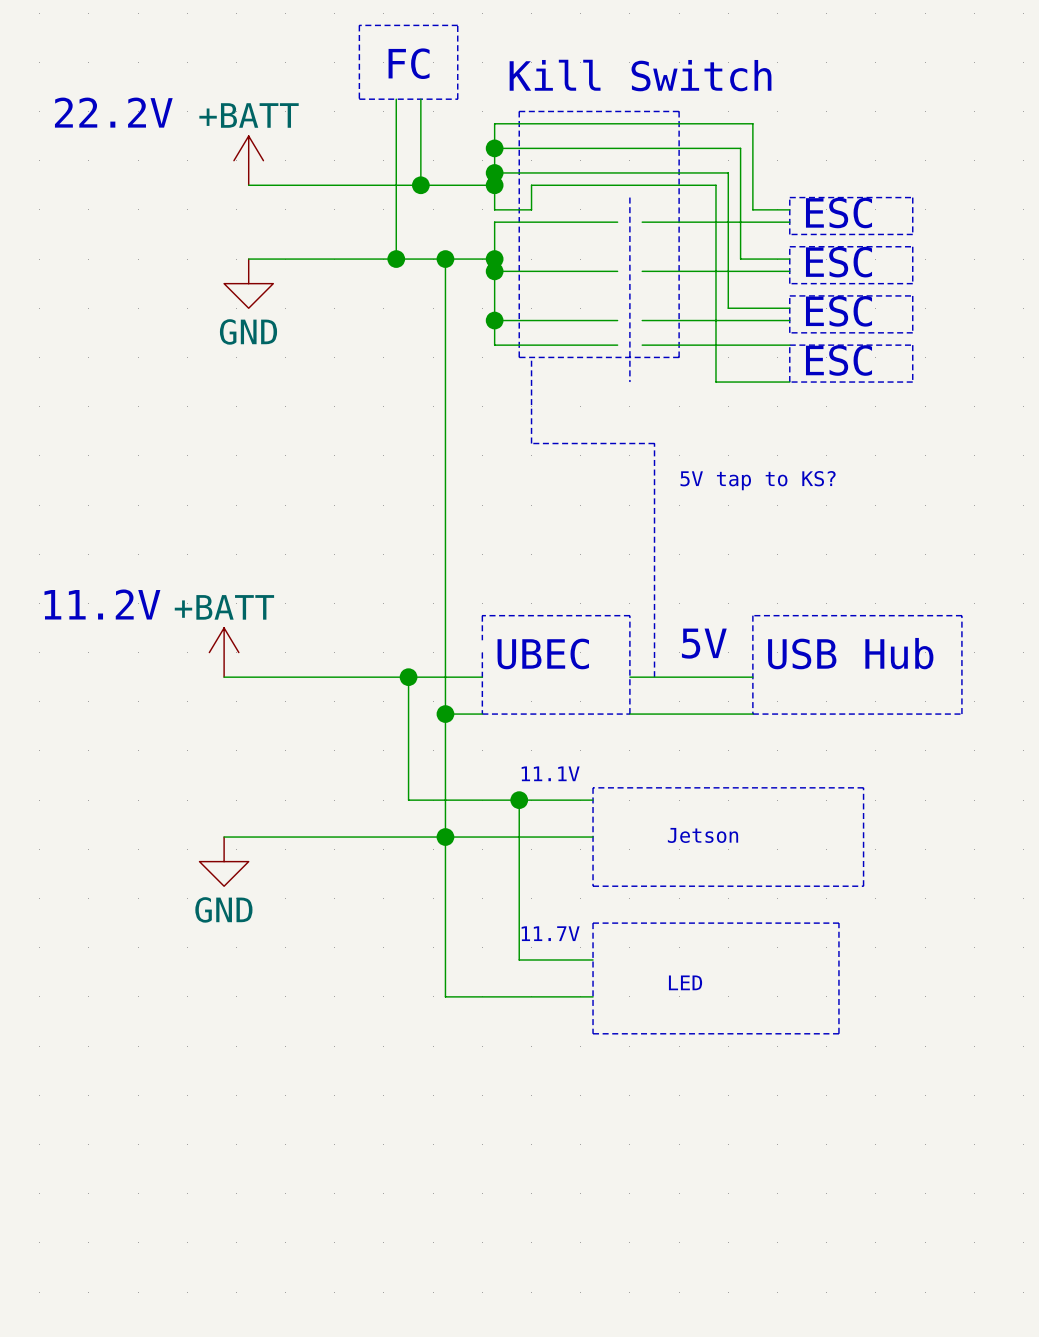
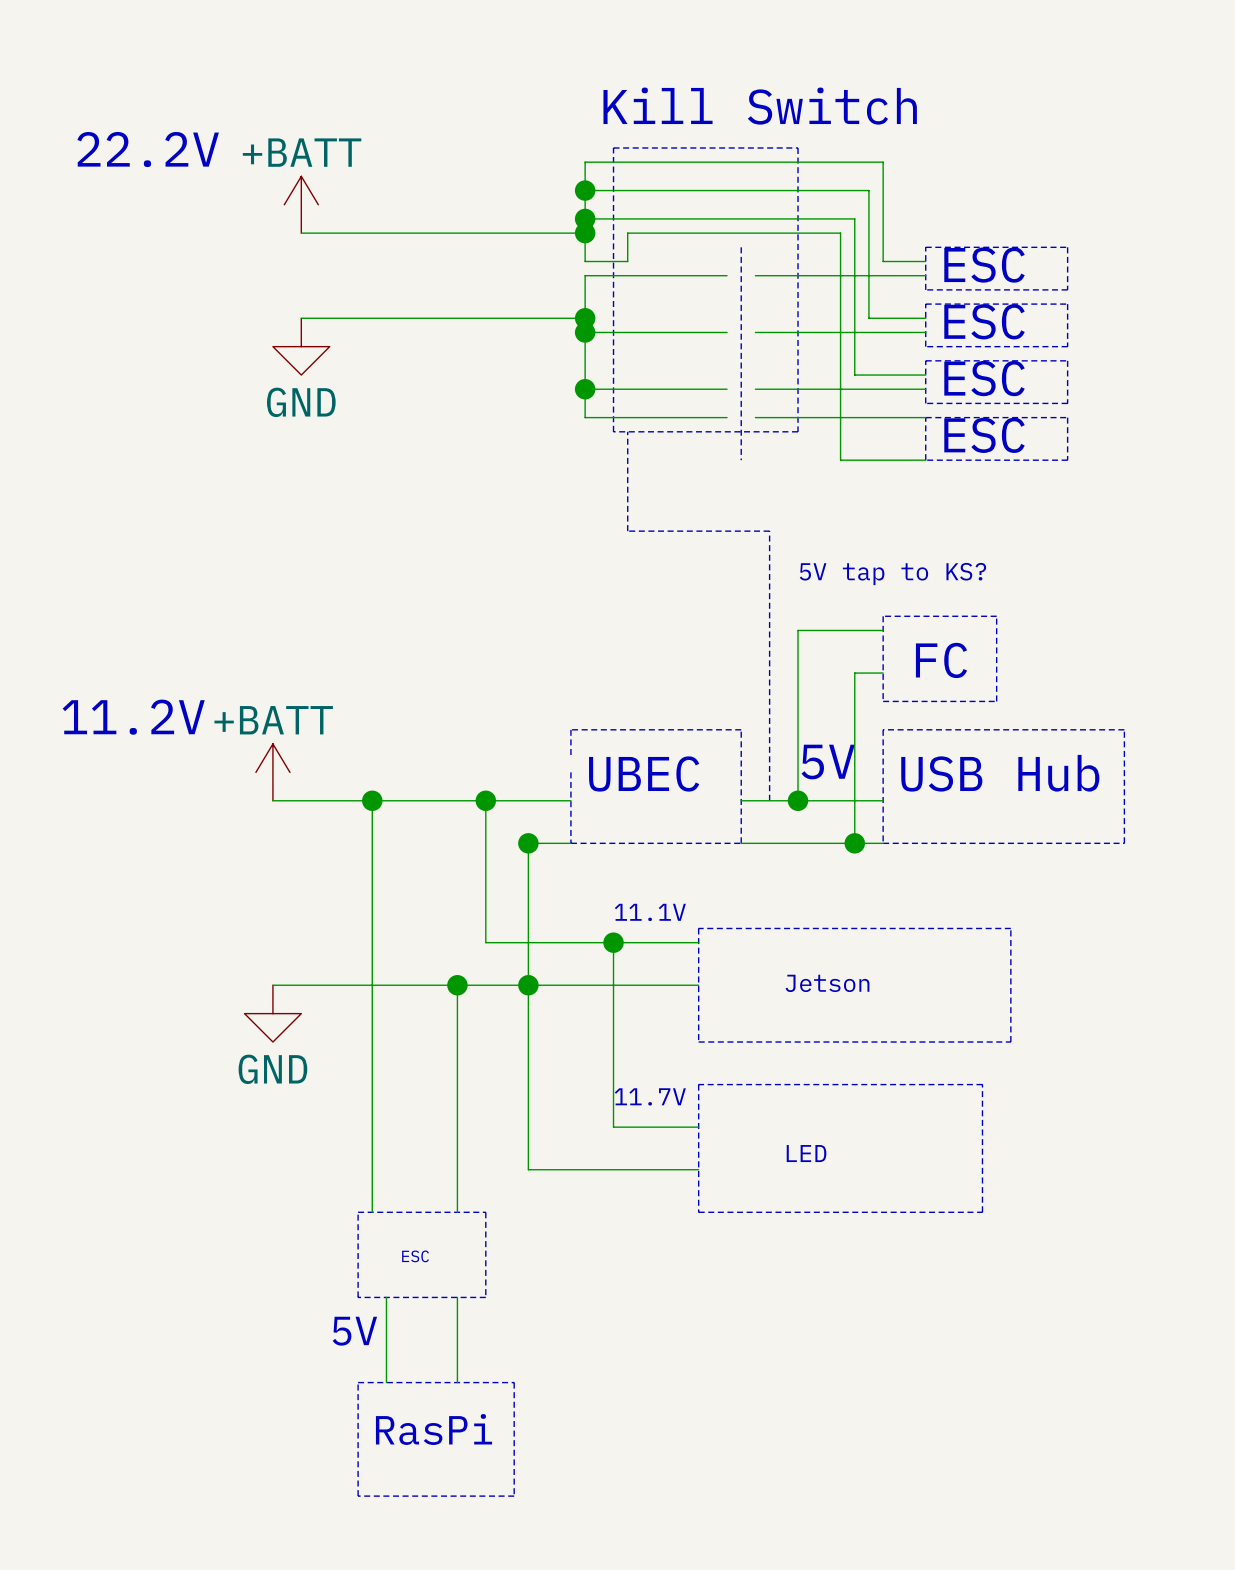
line: (359, 25) (457, 25) (457, 99) (359, 99) (359, 25) -> none
text: FC (409, 63) -> none
wire: (396, 99) (396, 259) -> none
wire: (420, 99) (420, 185) -> none
junction: (420, 185) -> none
junction: (396, 259) -> none
wire: (445, 259) (445, 714) -> none
junction: (445, 259) -> none
line: none -> (883, 616) (996, 616) (996, 701) (883, 701) (883, 616)
wire: none -> (883, 630) (797, 630) (797, 800)
text: none -> FC (941, 660)
wire: none -> (883, 673) (854, 673) (854, 843)
wire: none -> (372, 800) (372, 1212)
junction: none -> (372, 800)
junction: none -> (797, 800)
junction: none -> (854, 843)
wire: none -> (457, 985) (457, 1212)
junction: none -> (457, 985)
line: none -> (358, 1212) (485, 1212) (485, 1297) (358, 1297) (358, 1212)
text: none -> ESC (415, 1256)
wire: none -> (386, 1297) (386, 1382)
wire: none -> (457, 1297) (457, 1382)
text: none -> 5V (354, 1331)
line: none -> (358, 1382) (514, 1382) (514, 1496) (358, 1496) (358, 1382)
text: none -> RasPi (434, 1429)

